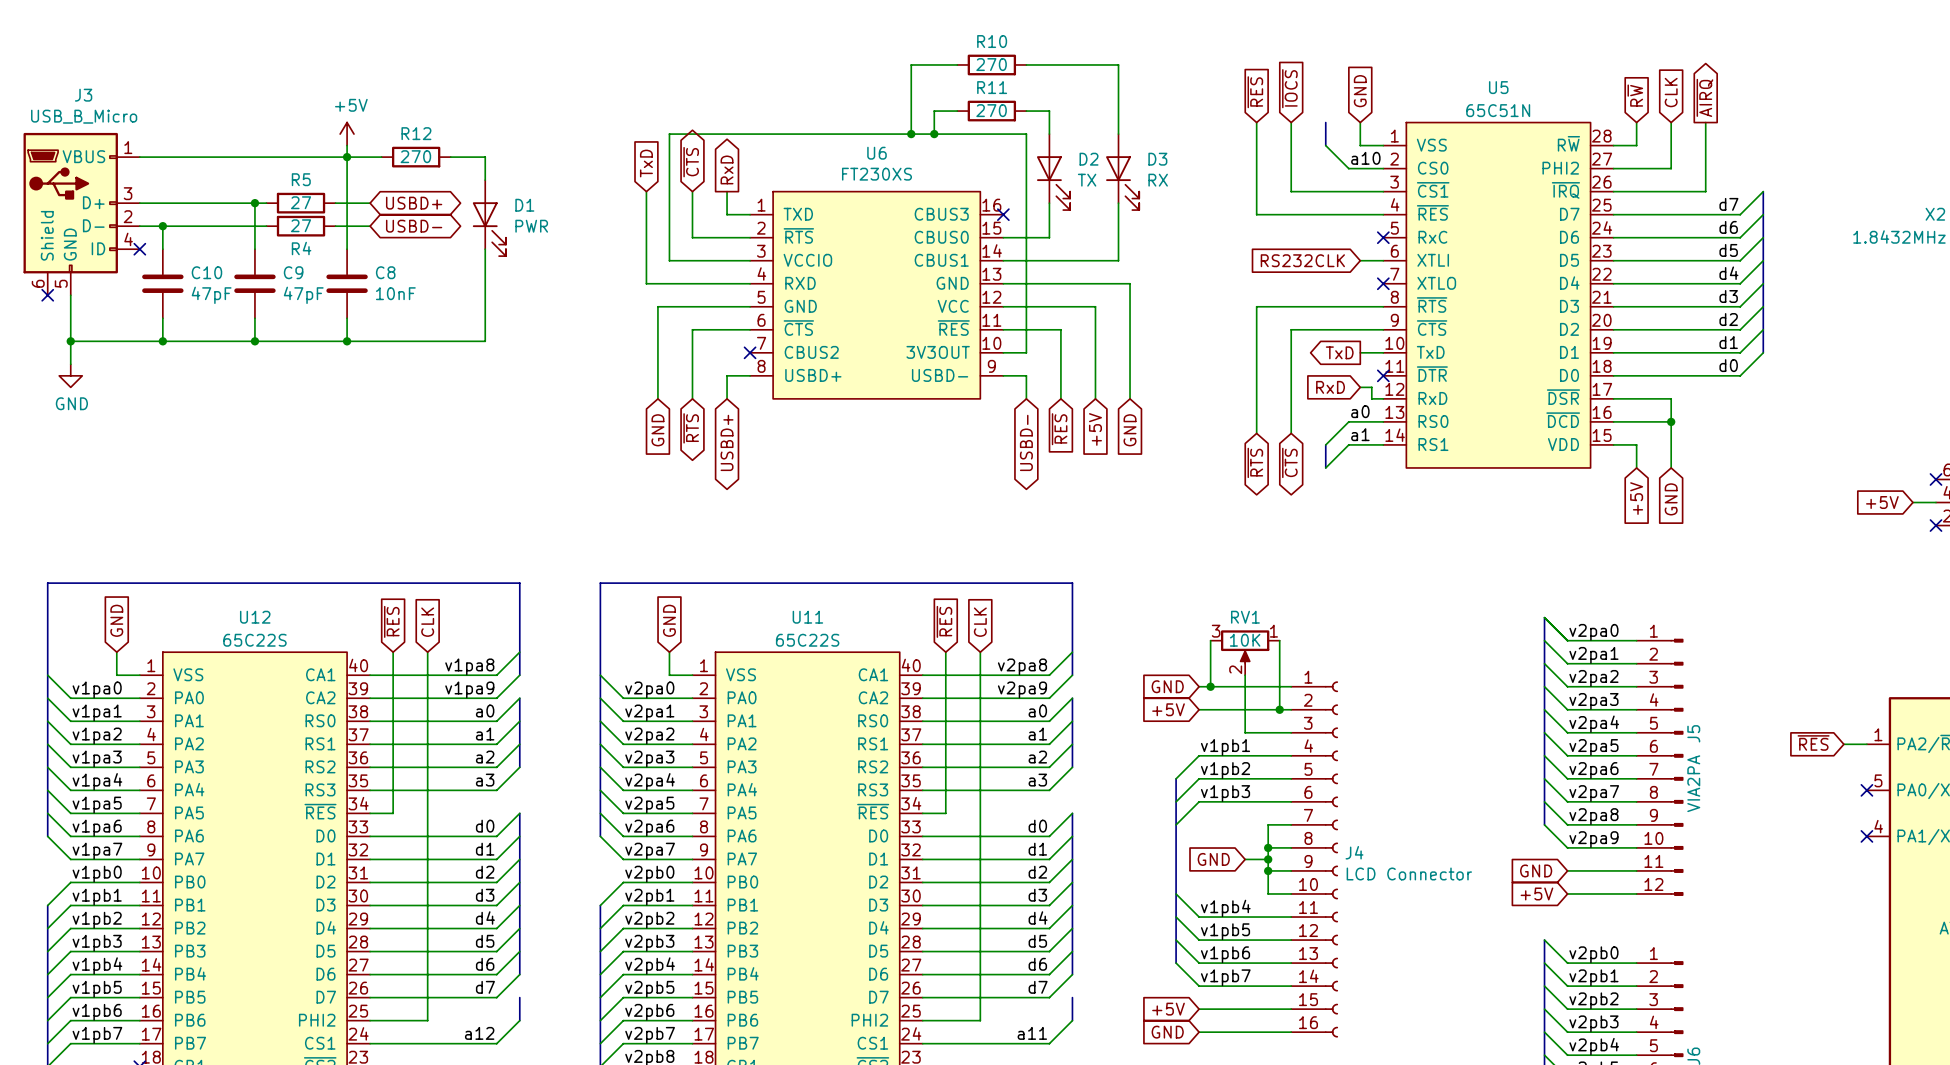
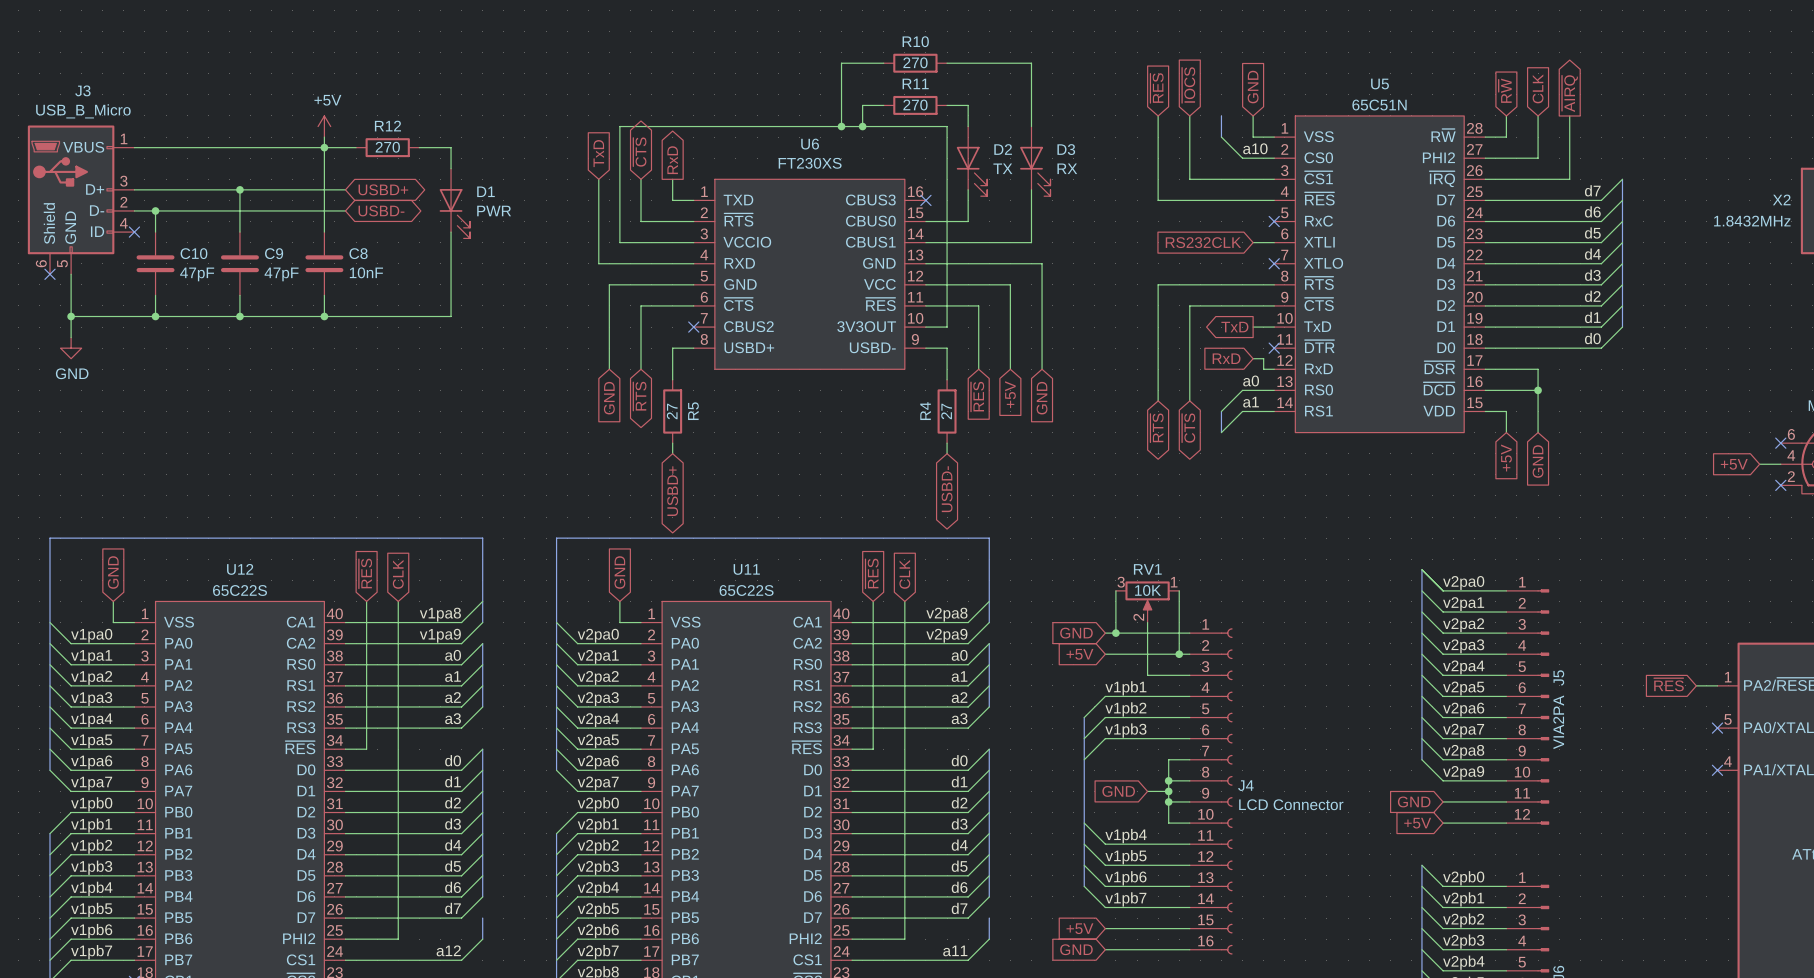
wire: none -> (250, 189) (313, 189)
R5 rotation: 0° (301, 203) -> 90° clockwise (672, 411)
R5 position: (301, 203) -> (672, 411)
wire: none -> (250, 210) (313, 210)
R4 rotation: 0° (301, 226) -> 90° clockwise (947, 411)
R4 position: (301, 226) -> (947, 411)
wire: none -> (672, 369) (672, 379)
wire: none -> (947, 369) (947, 379)
global label position: USBD+ (727, 442) -> USBD+ (672, 491)
global label position: USBD- (1026, 442) -> USBD- (947, 489)
wire: none -> (672, 443) (672, 453)
wire: none -> (947, 443) (947, 453)

